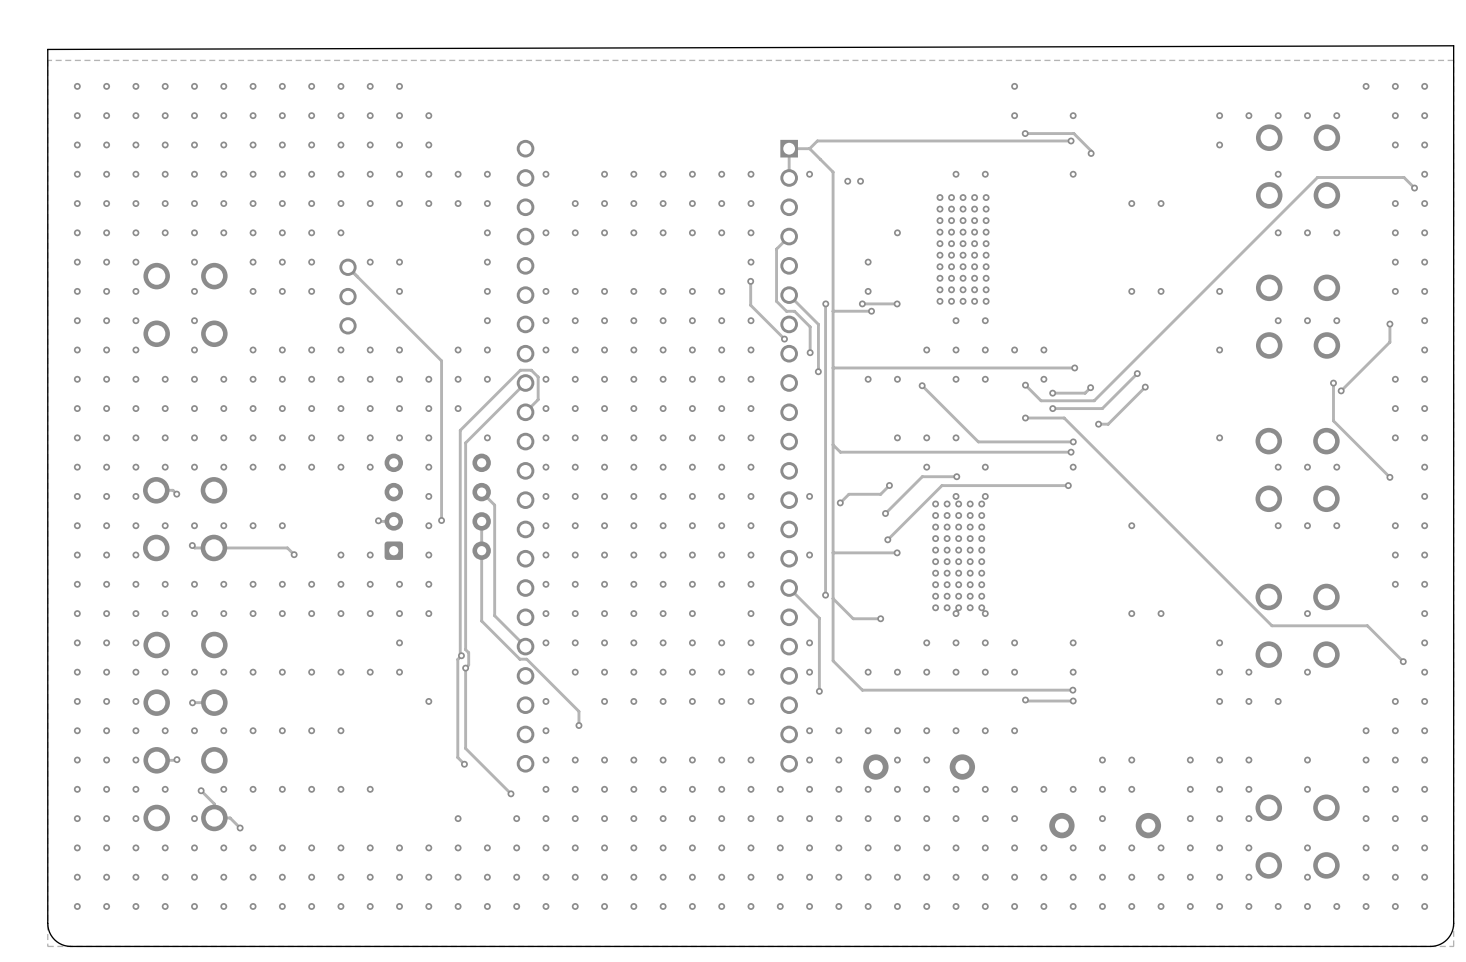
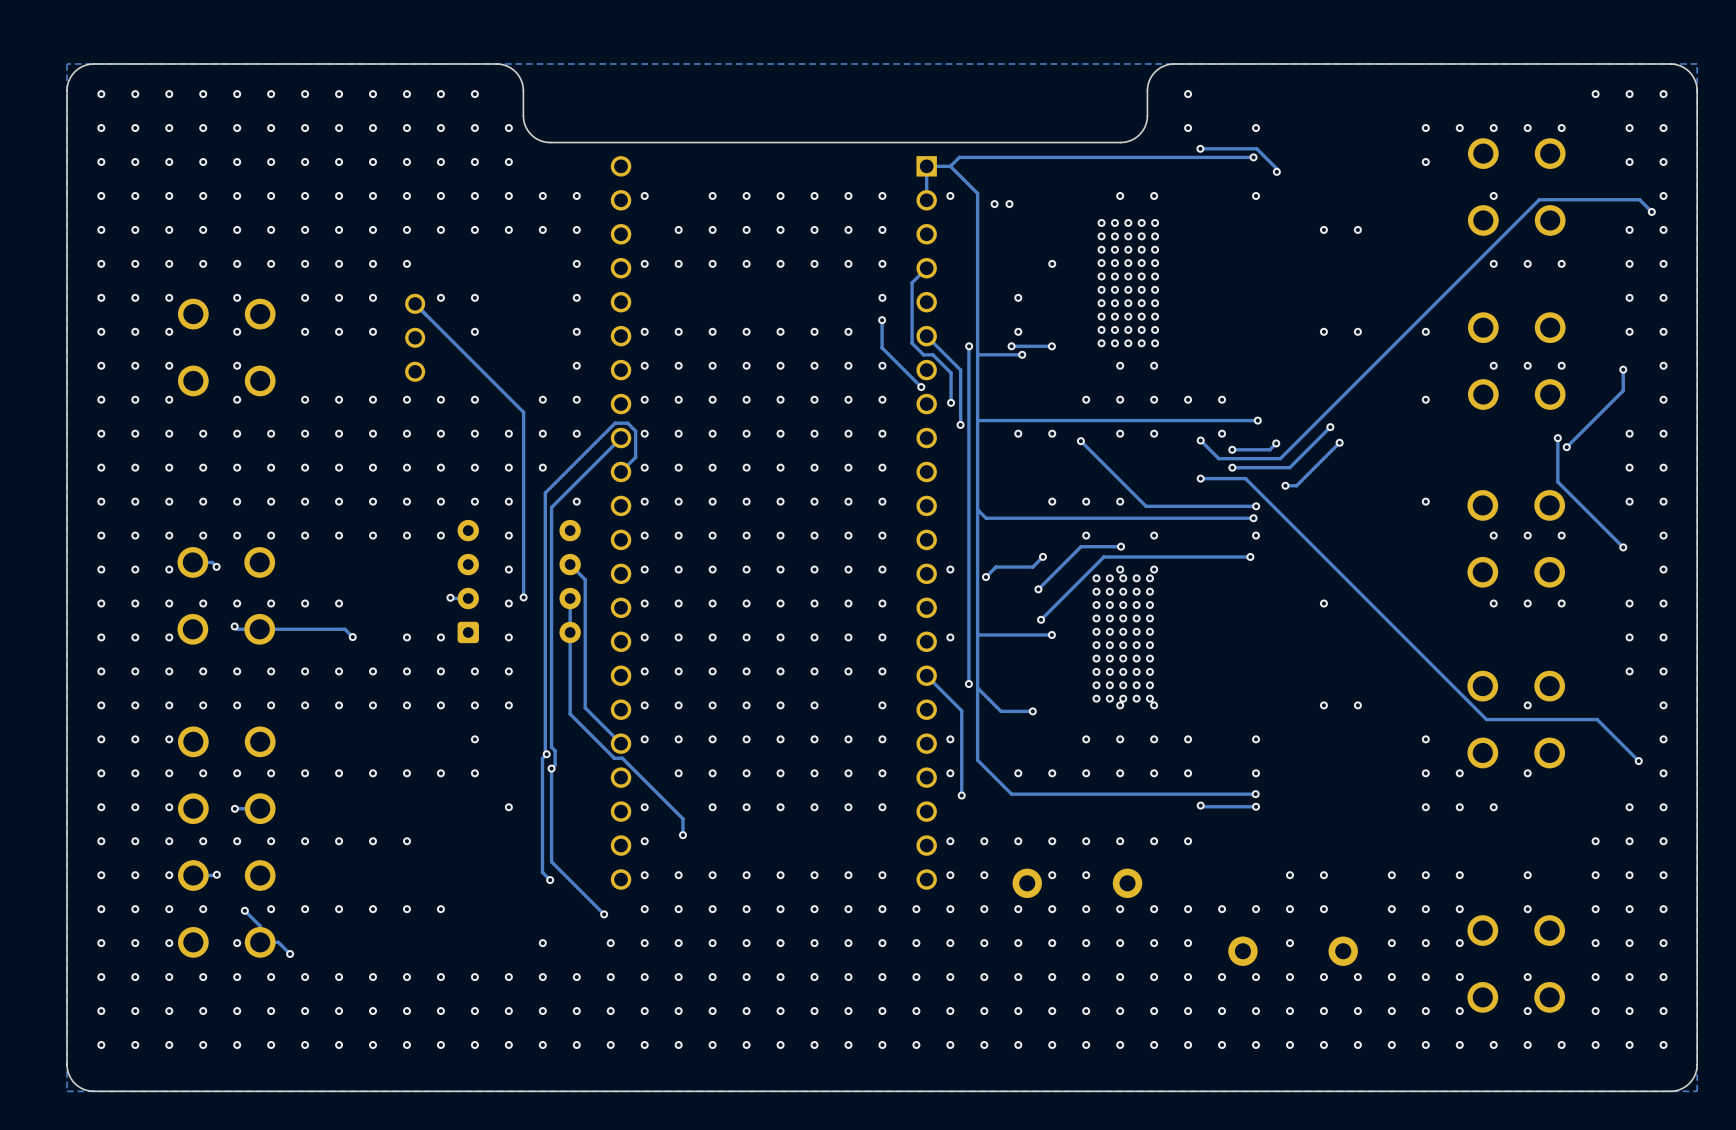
board edge: (1453, 83) (1453, 45) (47, 49) (47, 83) -> (1697, 90) (1695, 80) (1689, 71) (1680, 66) (1670, 63) (1171, 64) (1159, 68) (1150, 79) (1147, 87) (1147, 119) (1143, 129) (1134, 138) (1120, 142) (547, 142) (533, 136) (526, 127) (523, 118) (523, 87) (519, 76) (508, 66) (496, 63) (90, 64) (82, 66) (74, 71) (69, 79) (67, 90)

